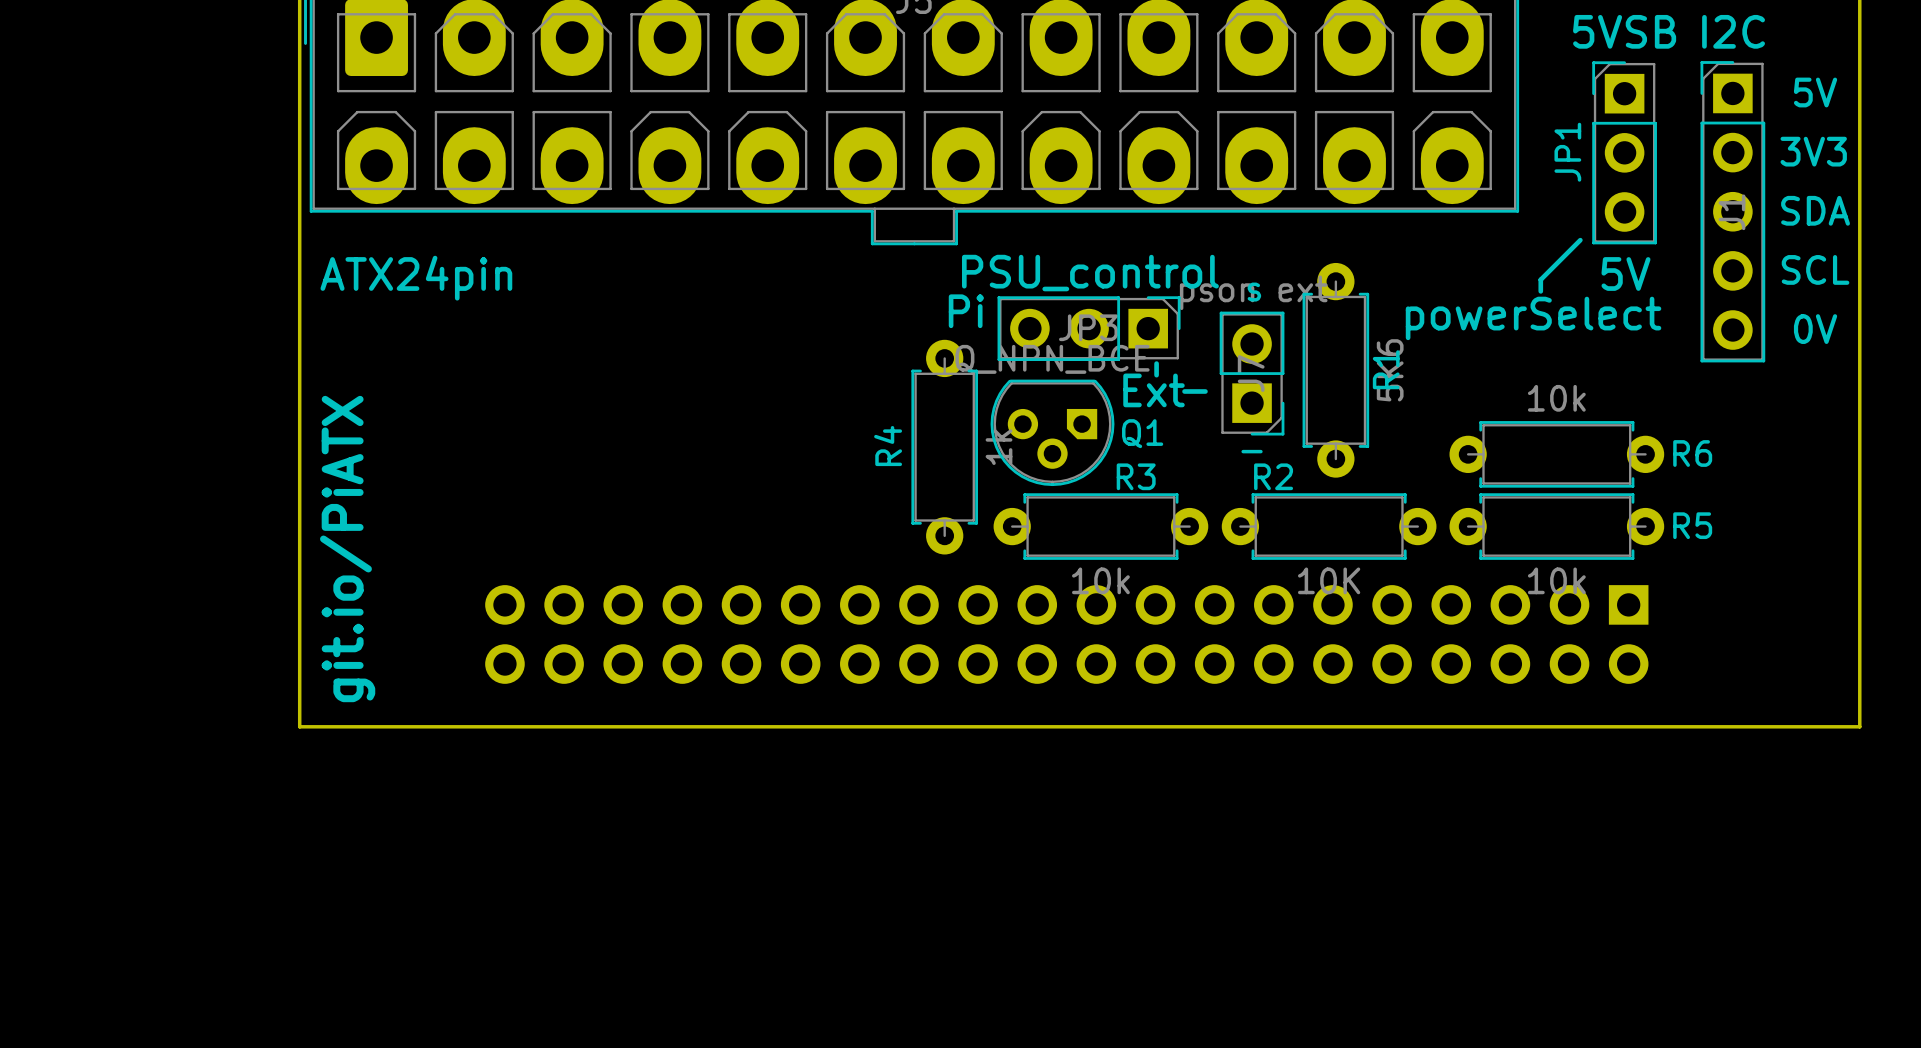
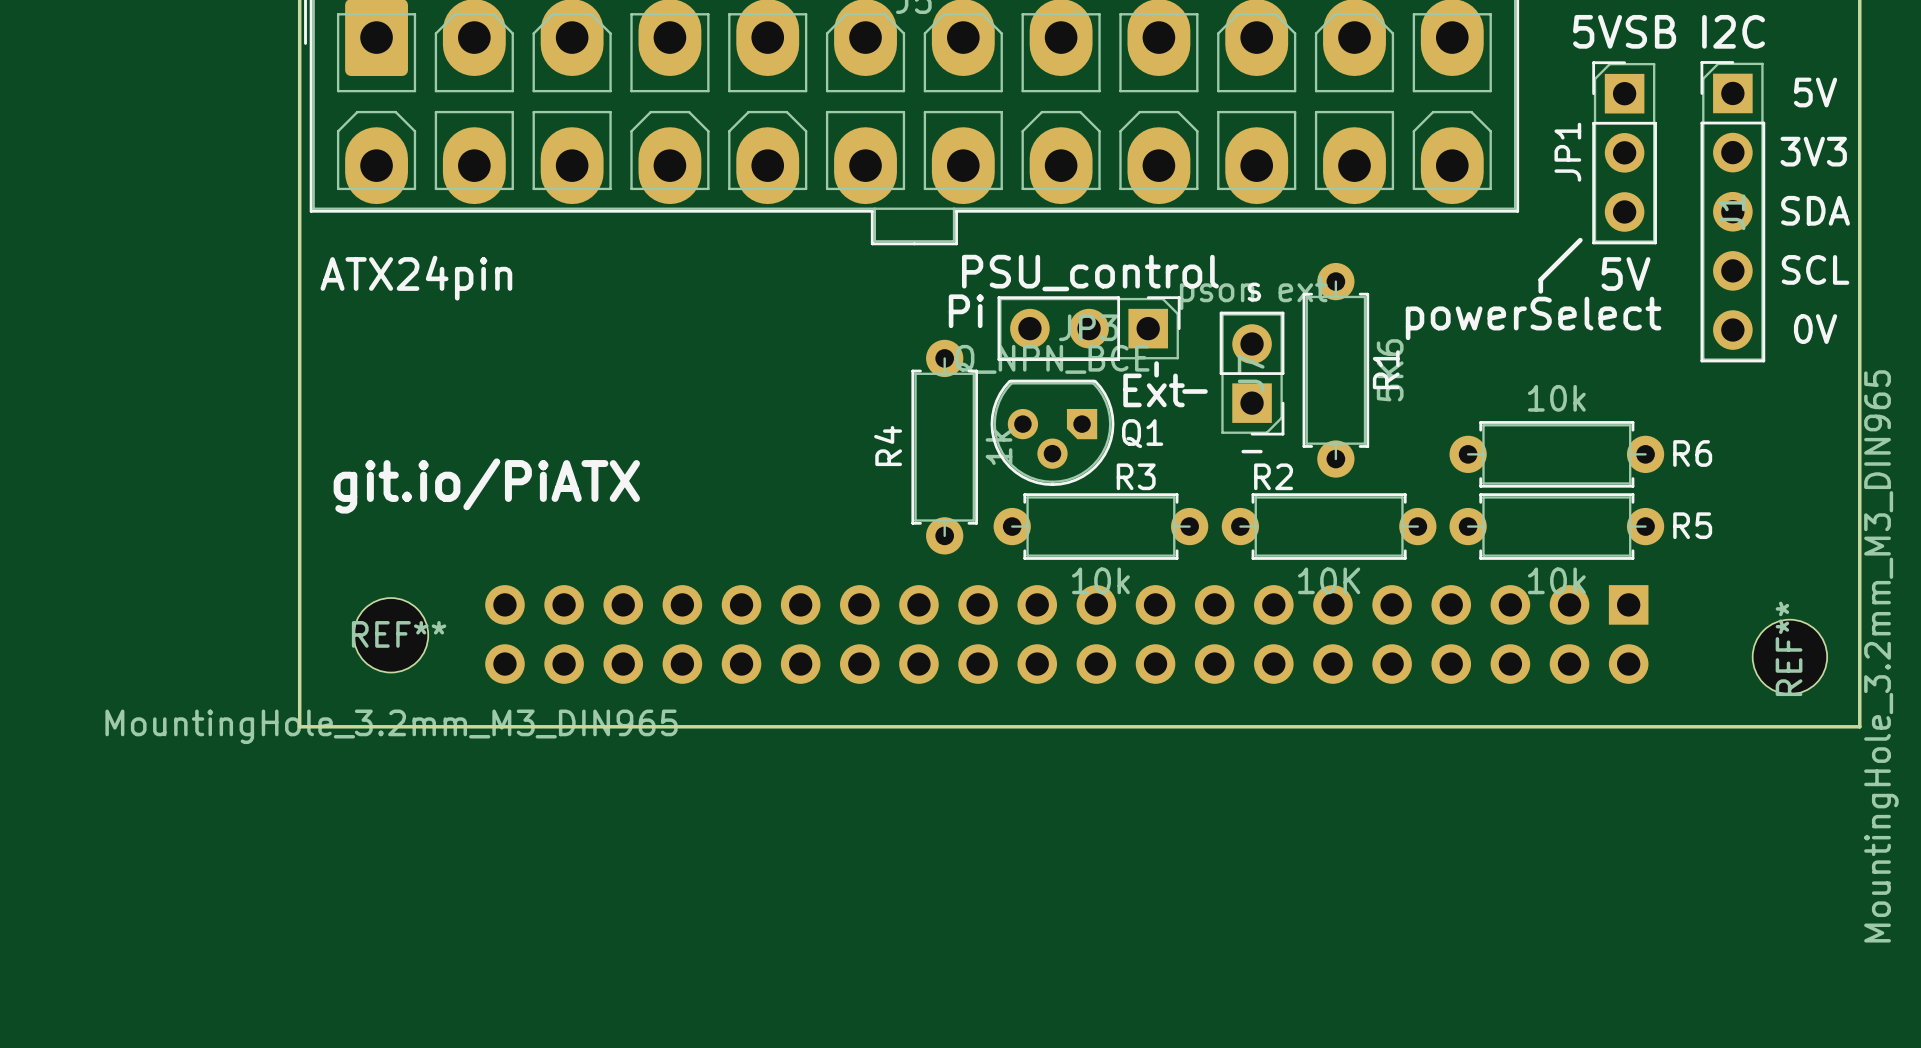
text rotation: 0° (347, 549) -> 90° clockwise (486, 485)
REF**: none -> MountingHole_3.2mm_M3_DIN965 (390, 635)
REF**: none -> MountingHole_3.2mm_M3_DIN965 (1789, 656)

